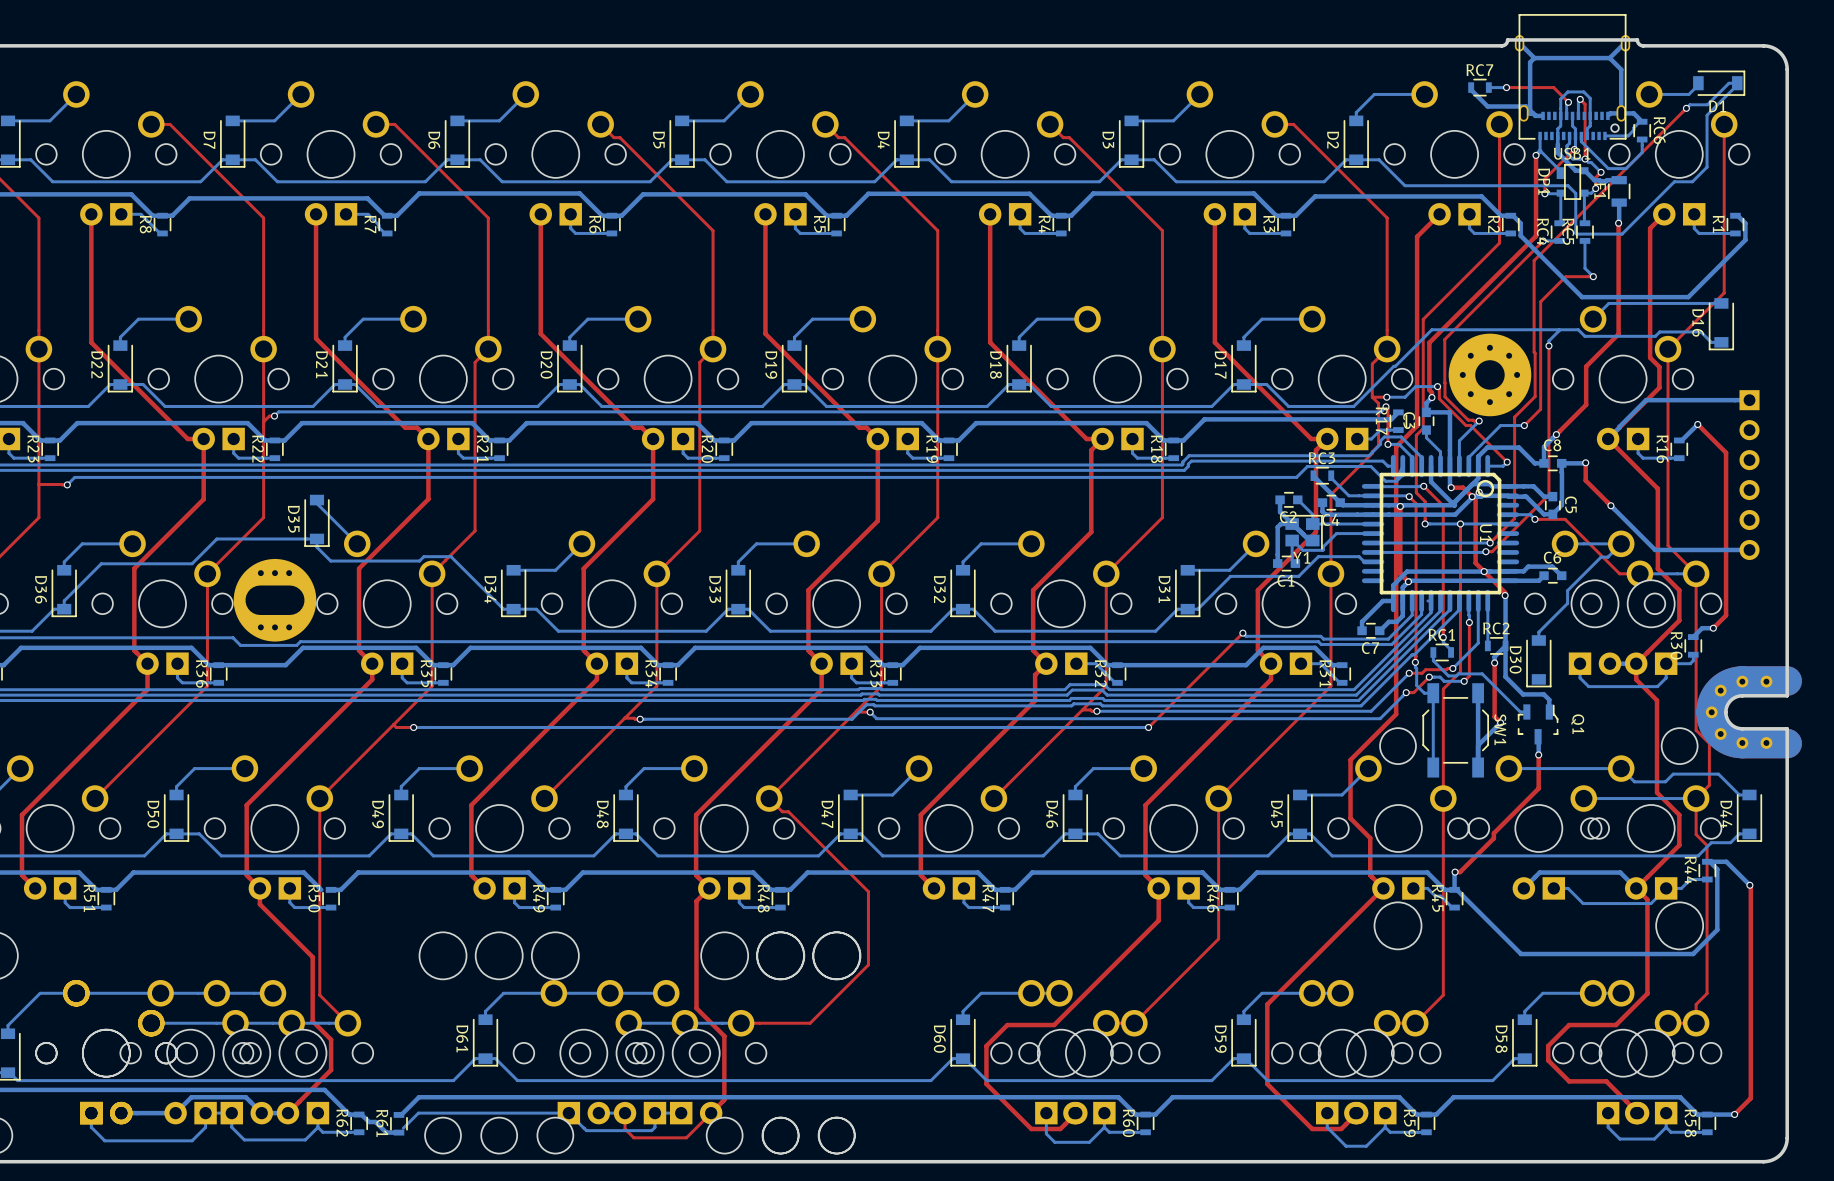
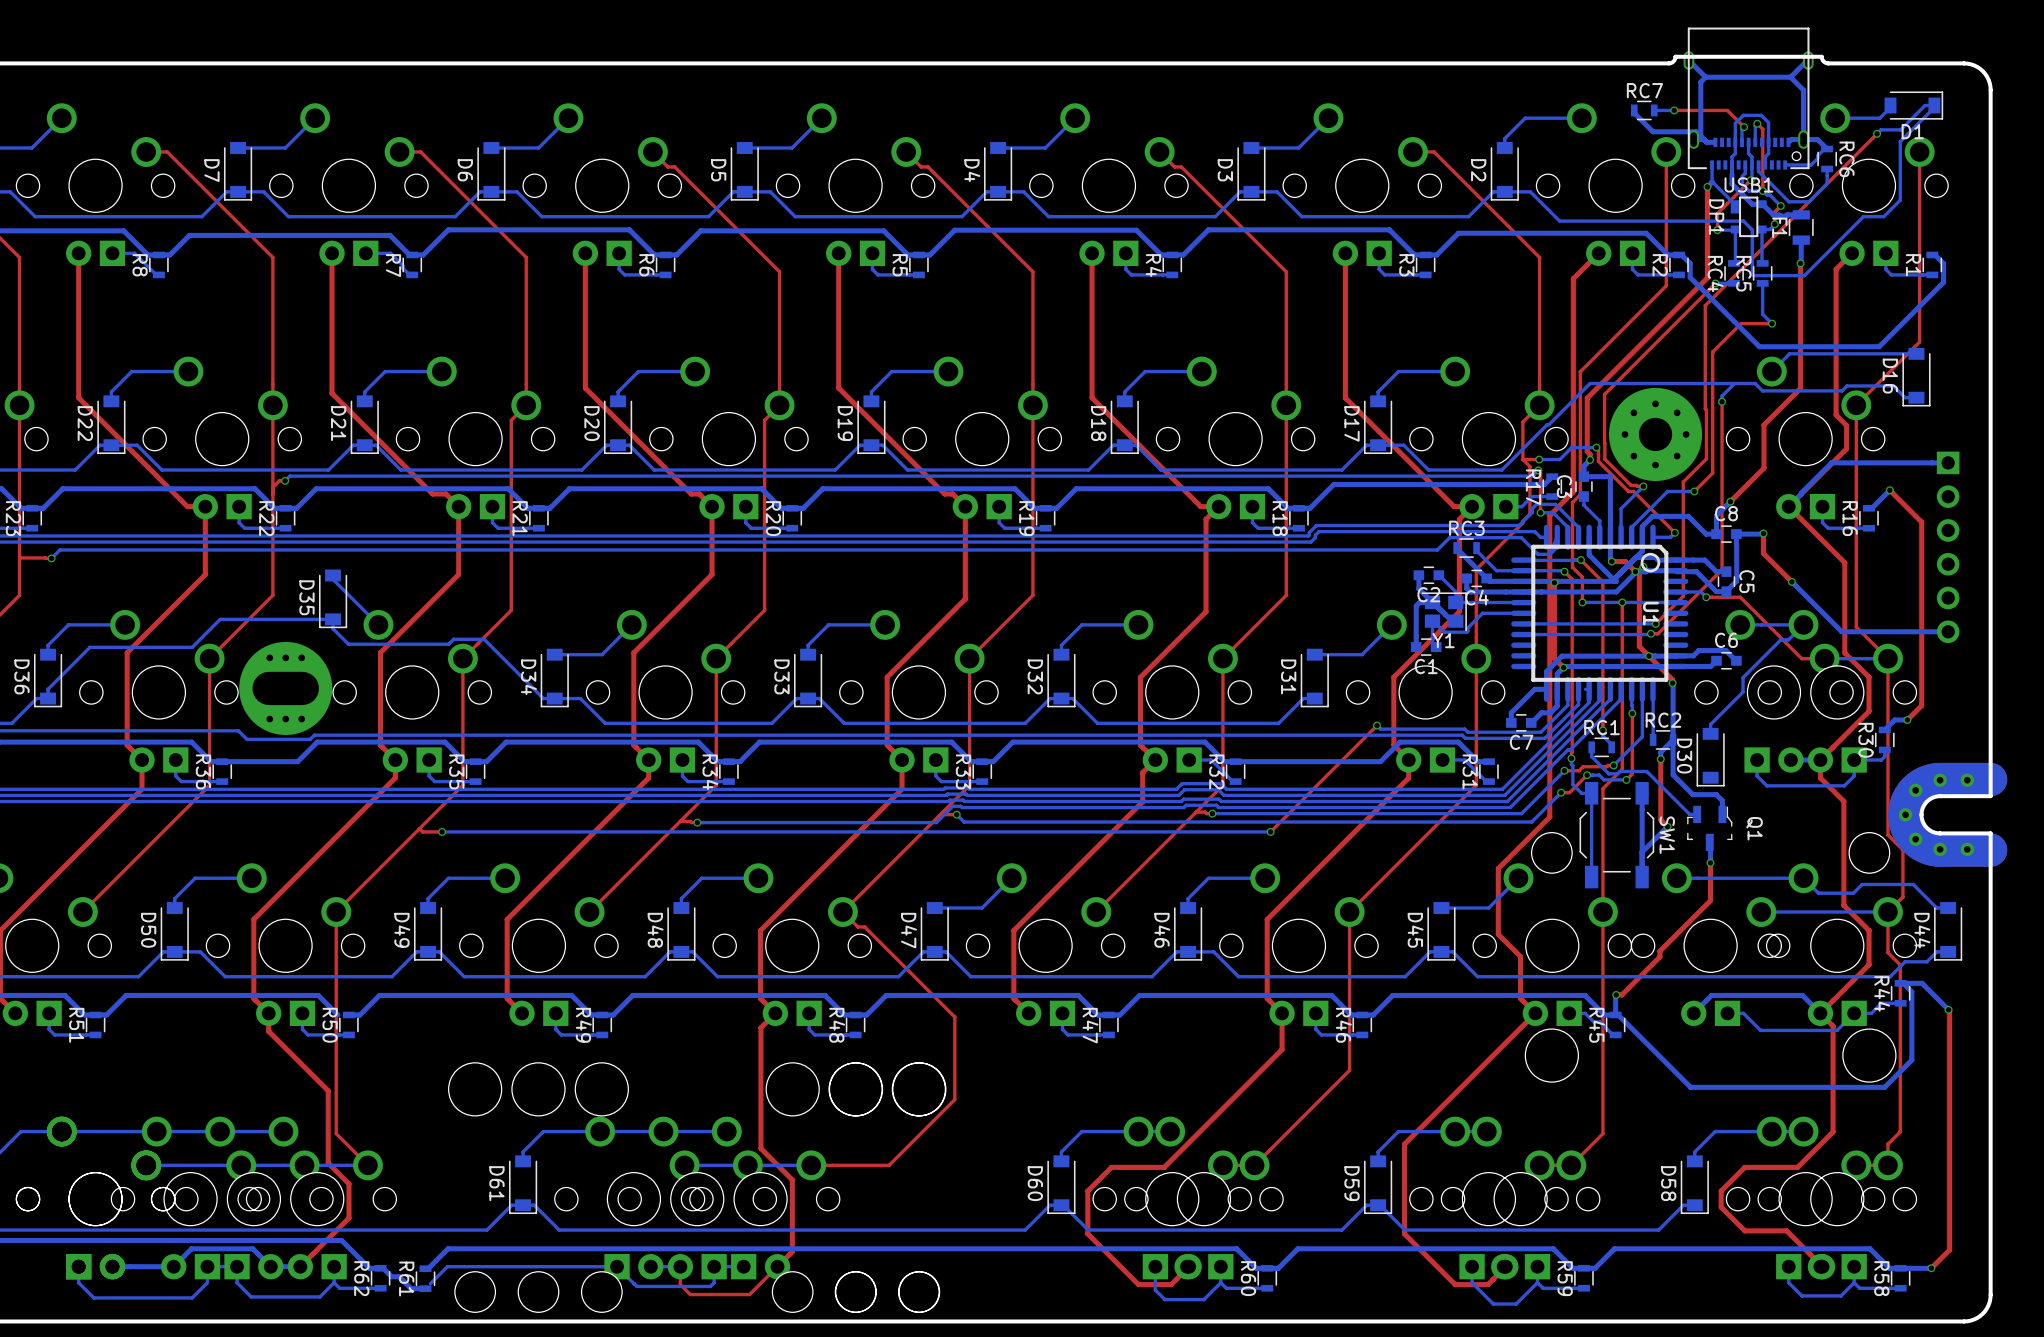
bottom track: (1373, 561) (1364, 561) (1359, 556) (1318, 556) (1298, 576) (1230, 576) (1197, 609) (1187, 609) -> none

